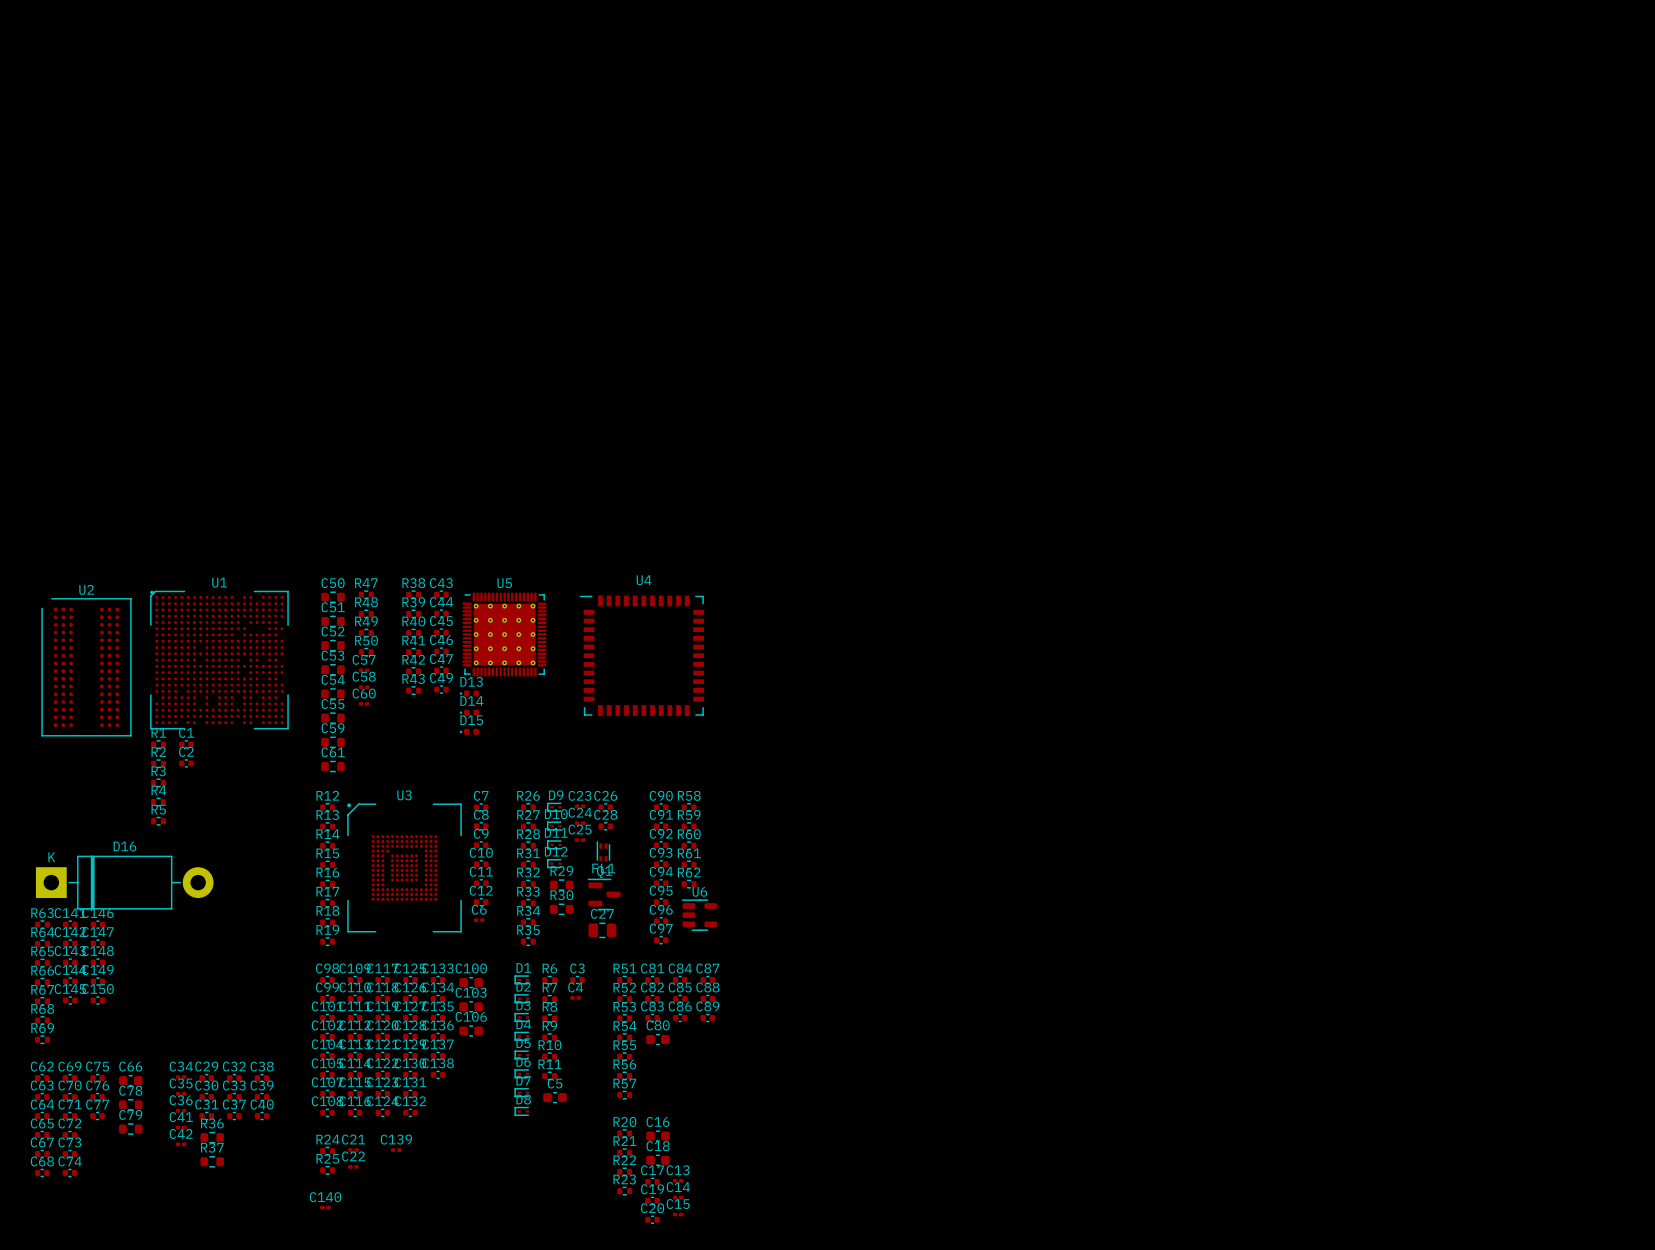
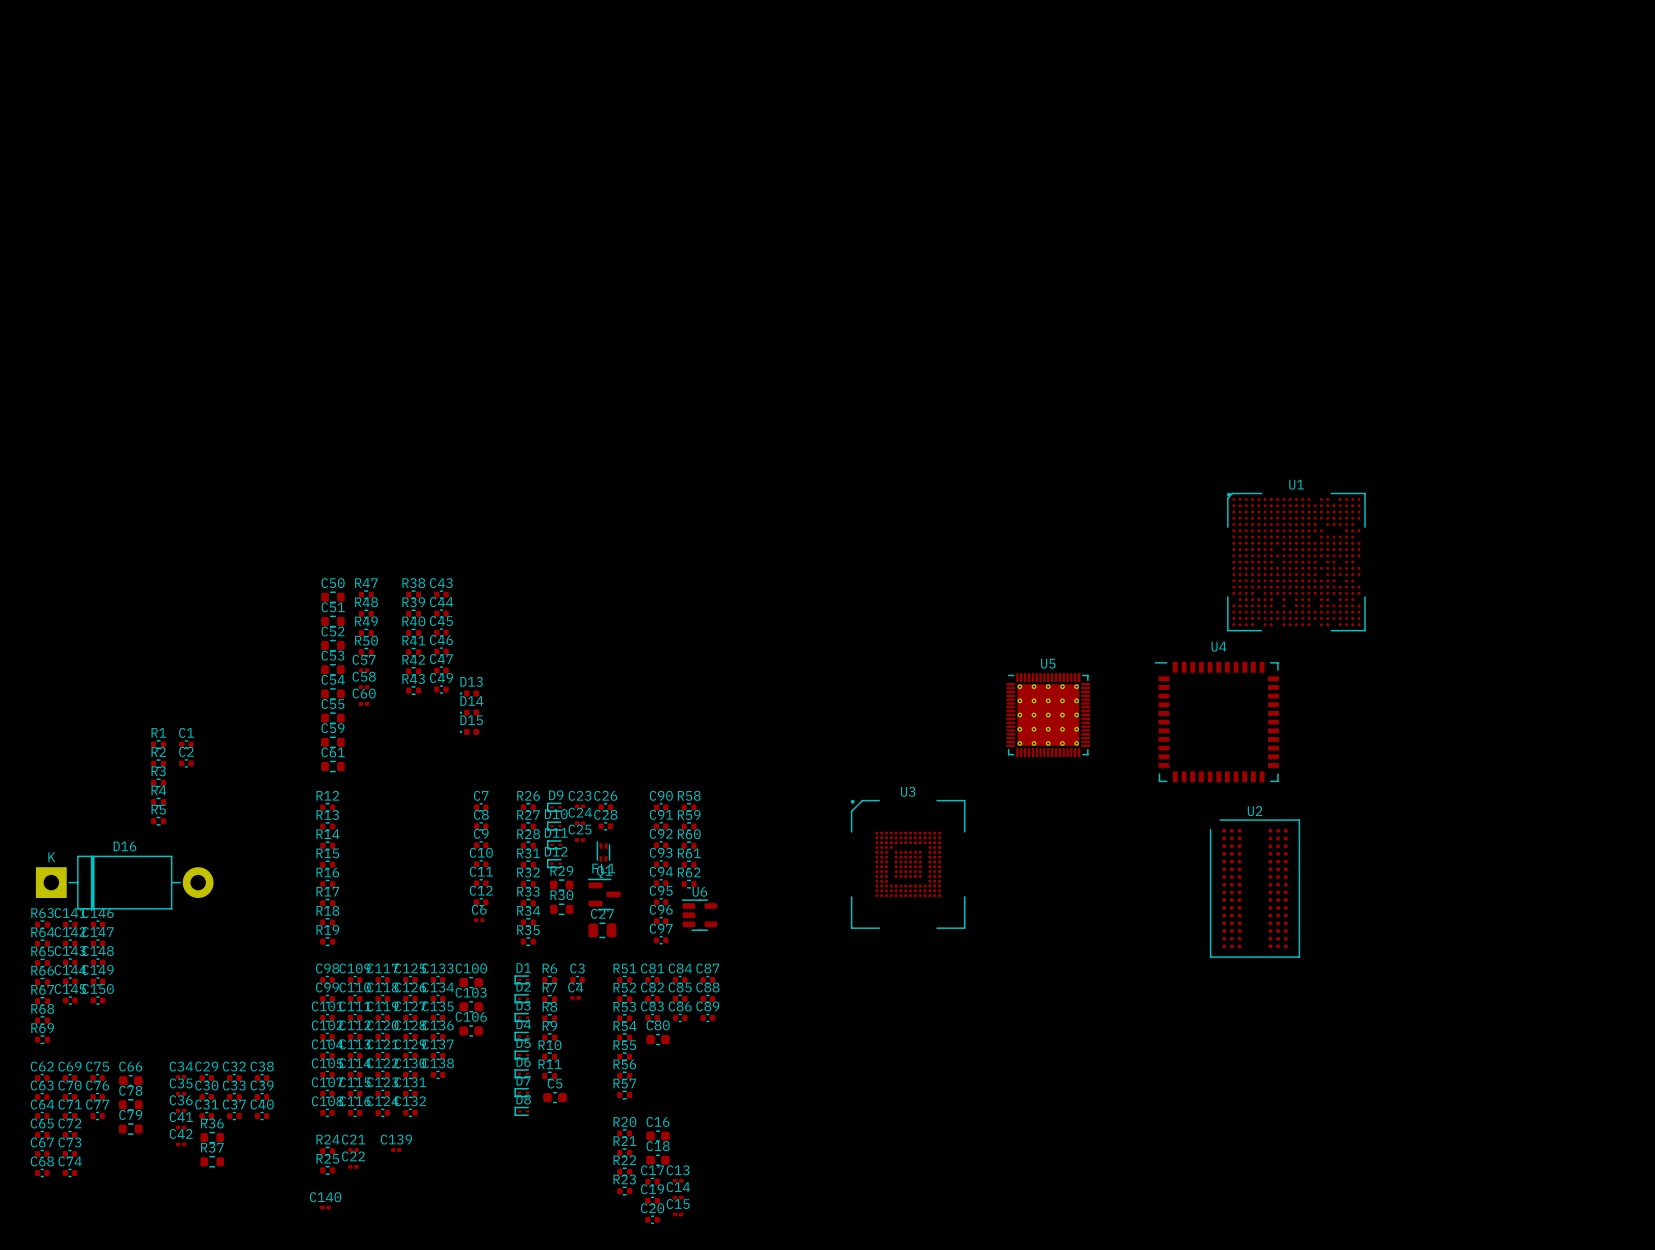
U5 position: (504, 634) -> (1048, 715)
U4 position: (642, 655) -> (1216, 722)
U1 position: (219, 659) -> (1296, 561)
U2 position: (86, 667) -> (1254, 888)
U3 position: (404, 867) -> (908, 864)

